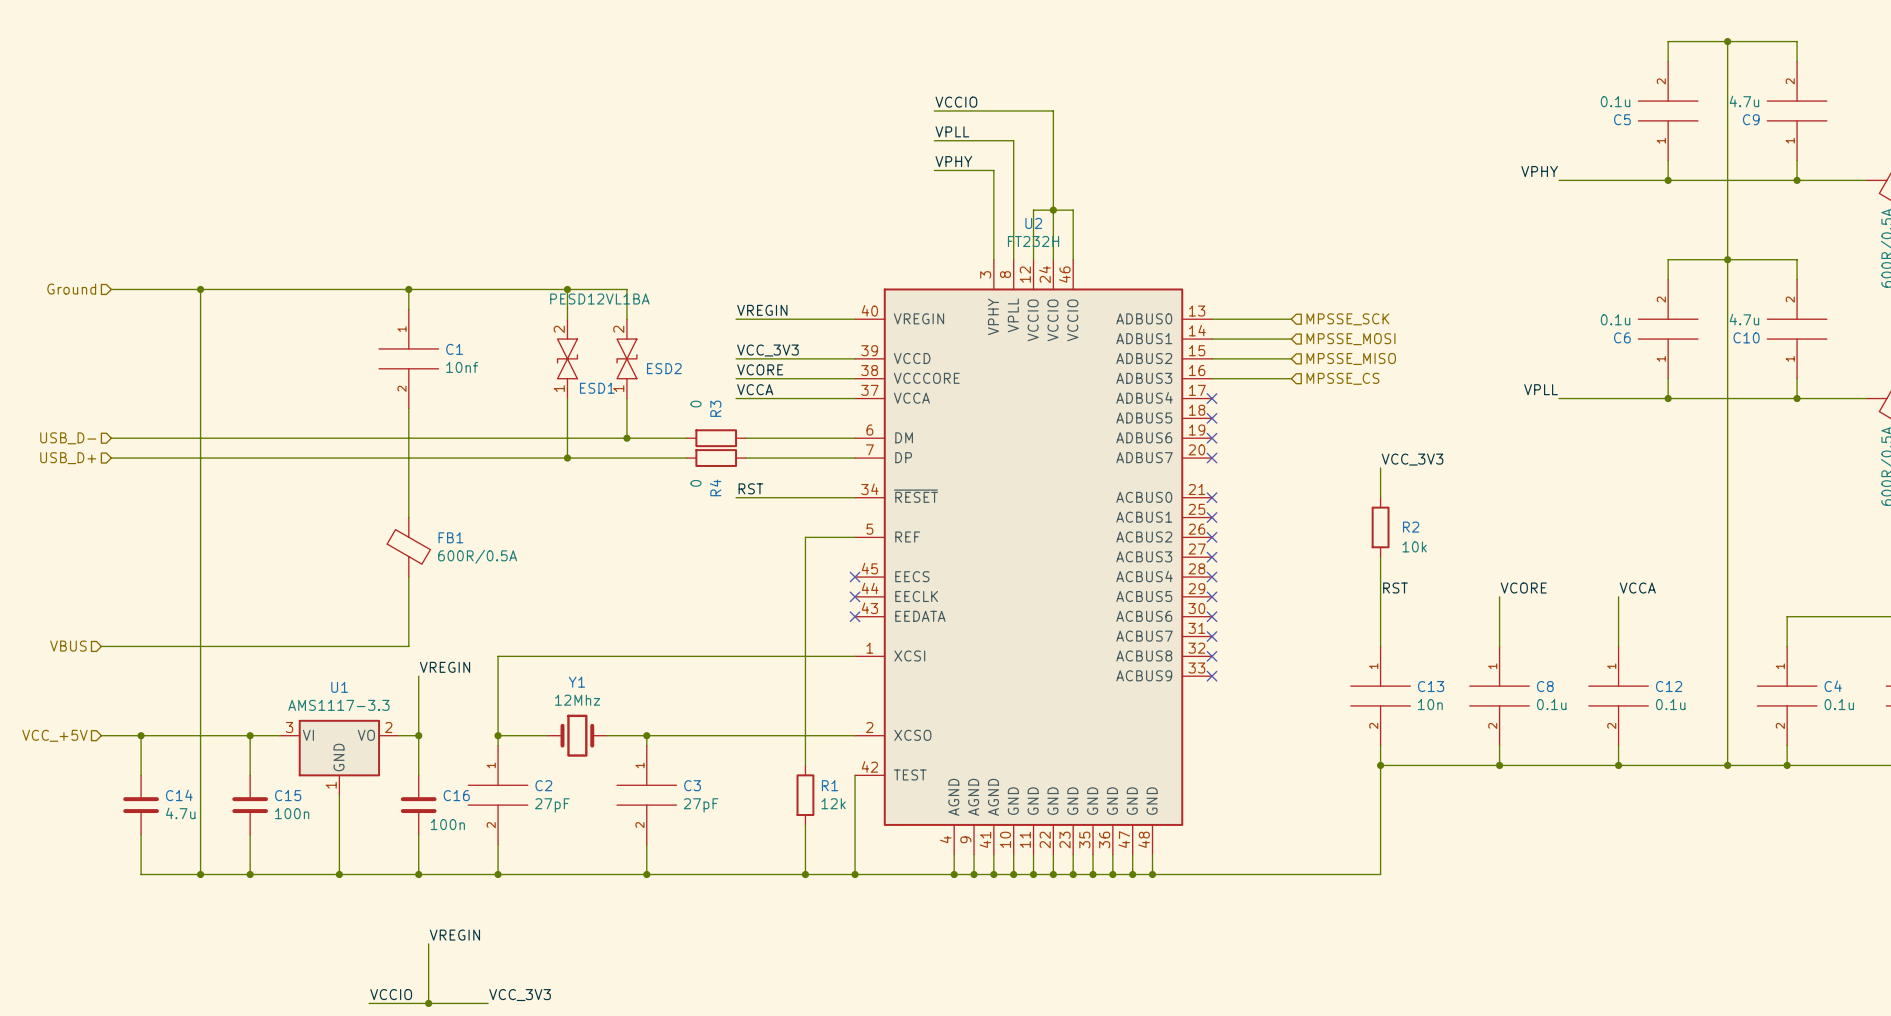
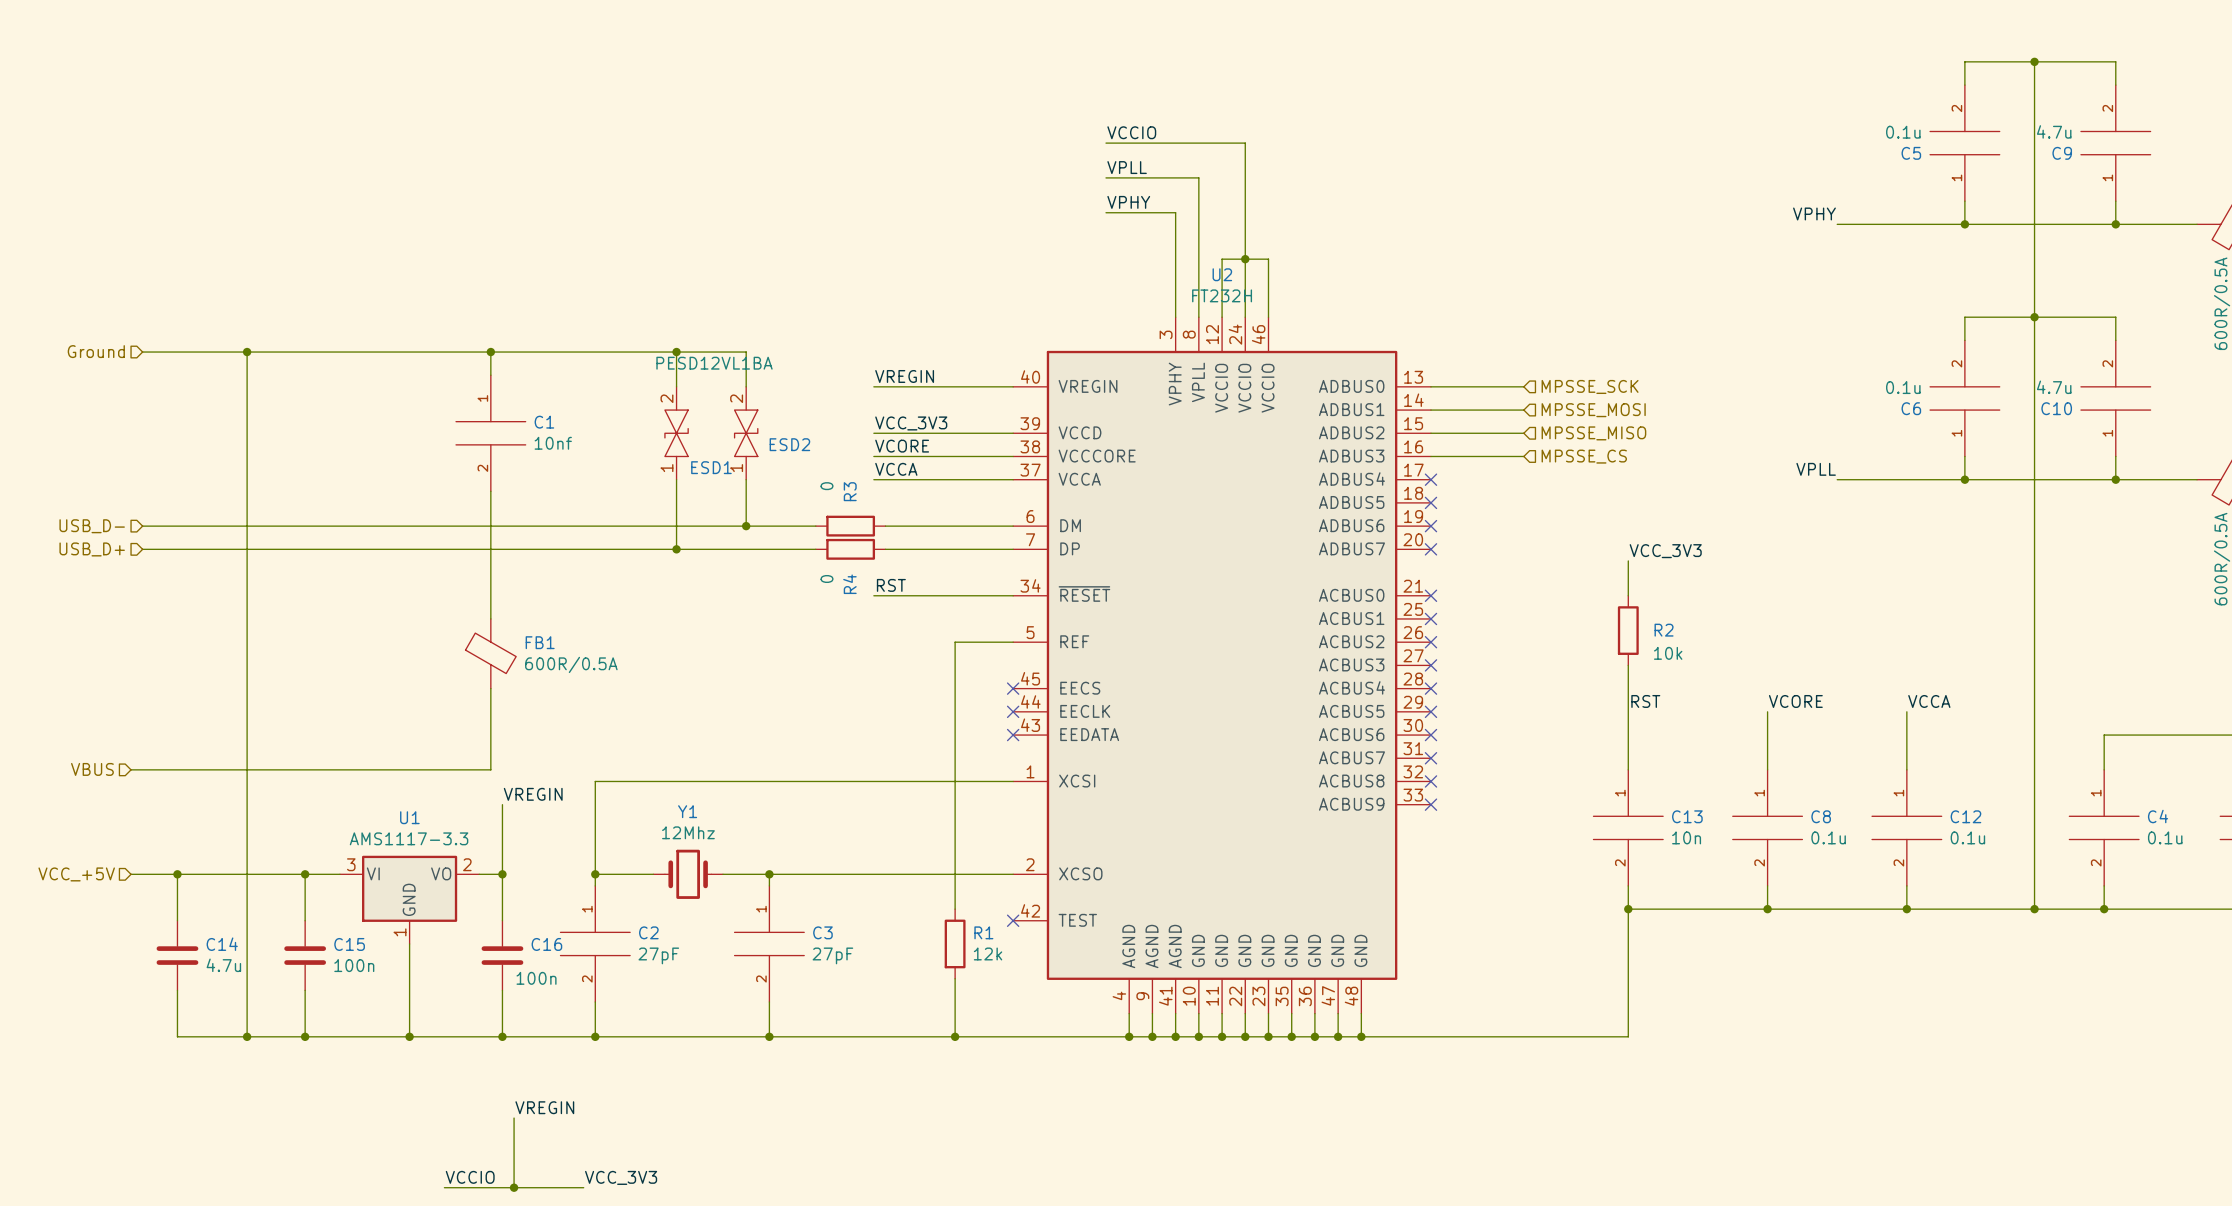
wire: (855, 775) (855, 874) -> none
no-connect mark: none -> (1013, 920)
junction: (855, 874) -> none

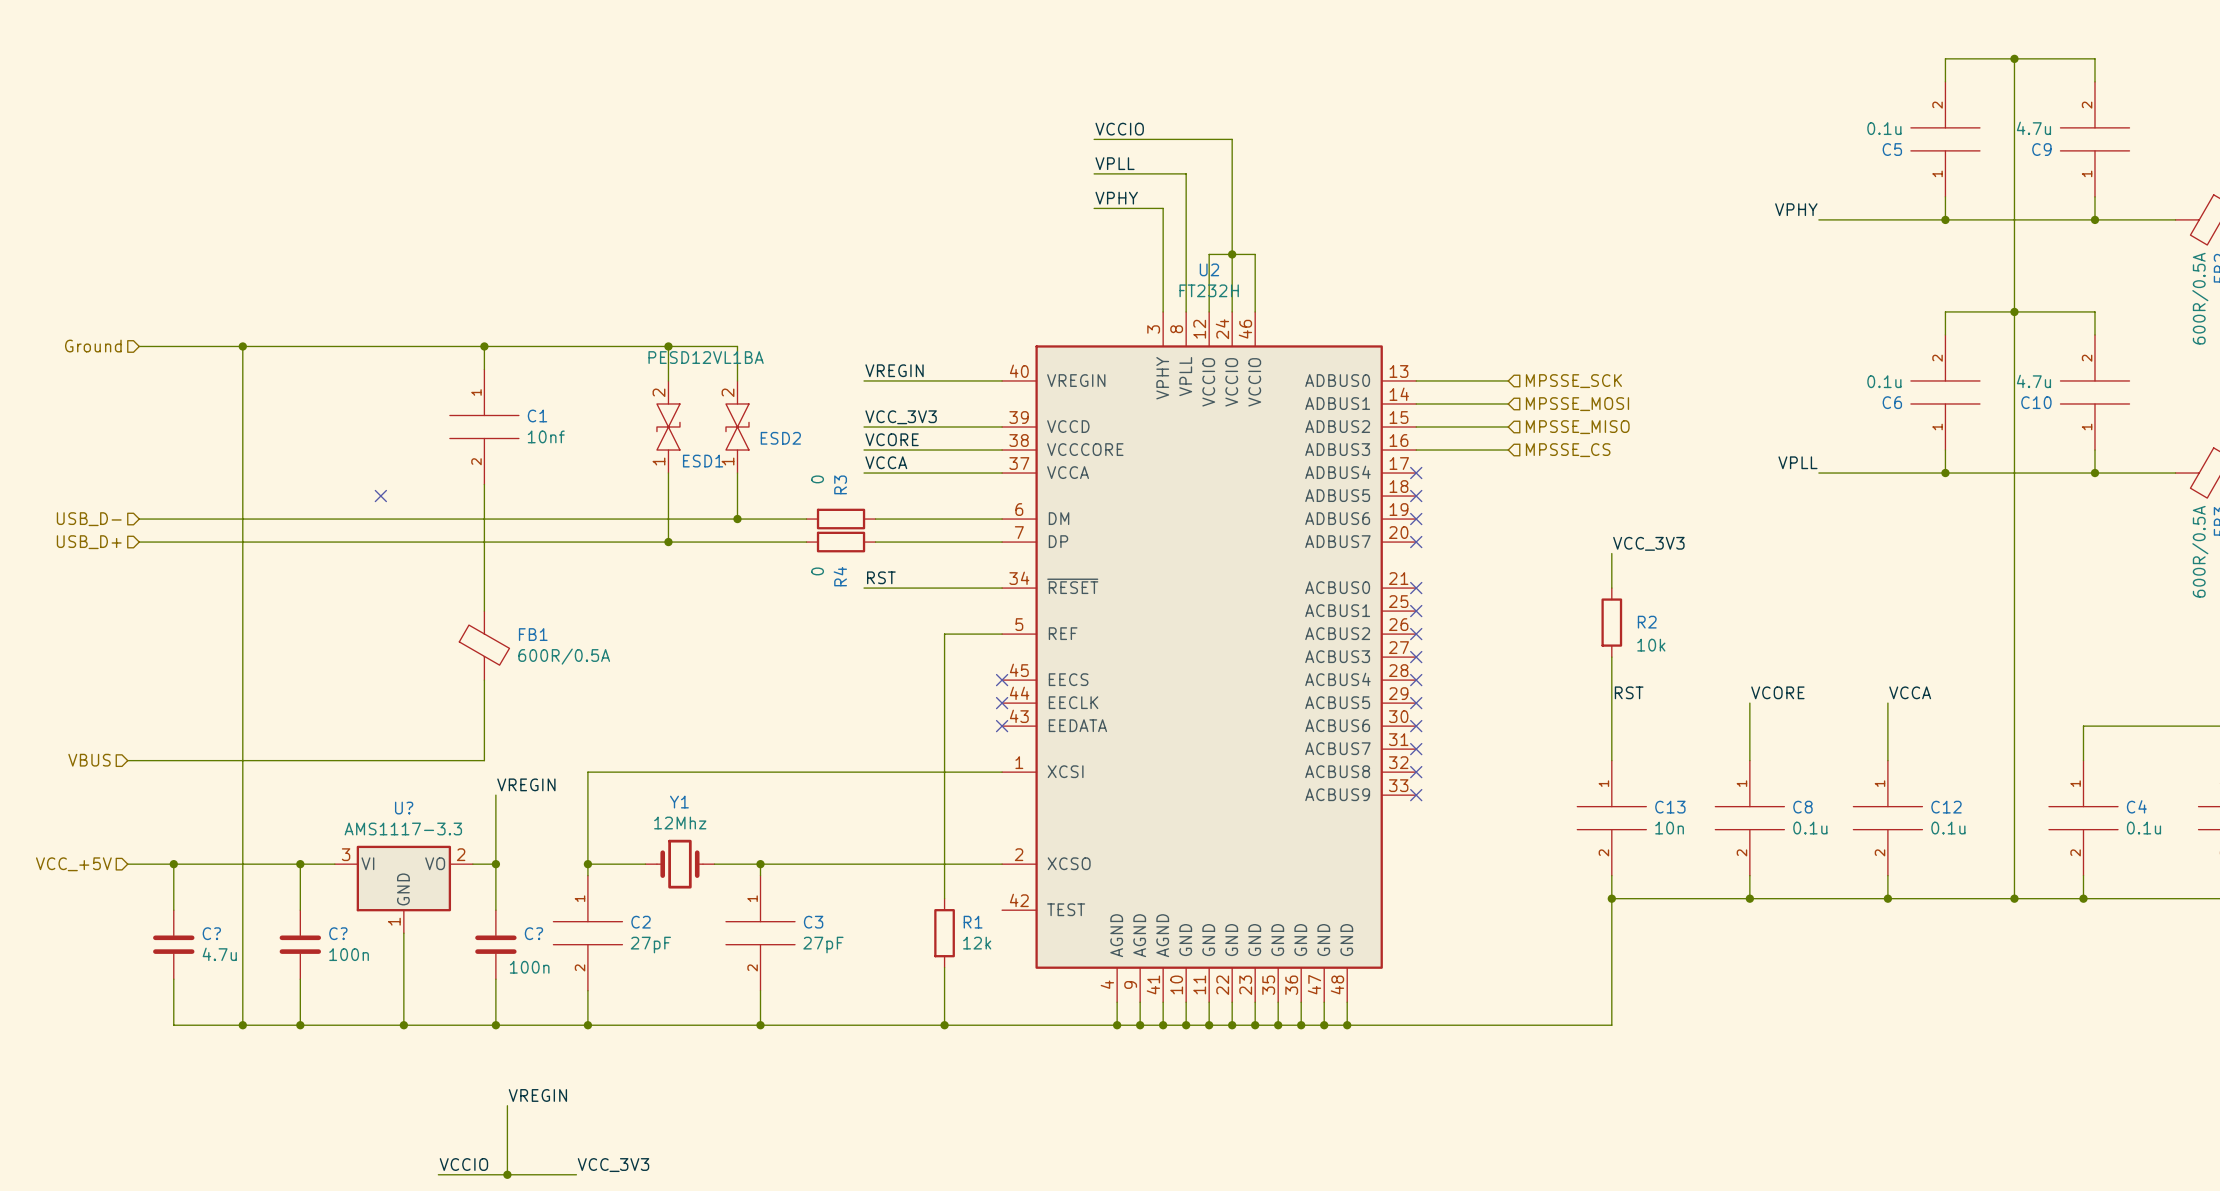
no-connect mark: none -> (380, 496)
U1 name: U1 (409, 817) -> U? (404, 808)
no-connect mark: (1013, 920) -> none
C14 name: C14 (222, 944) -> C? (211, 933)
C15 name: C15 (349, 944) -> C? (338, 933)
C16 name: C16 (546, 944) -> C? (533, 933)

